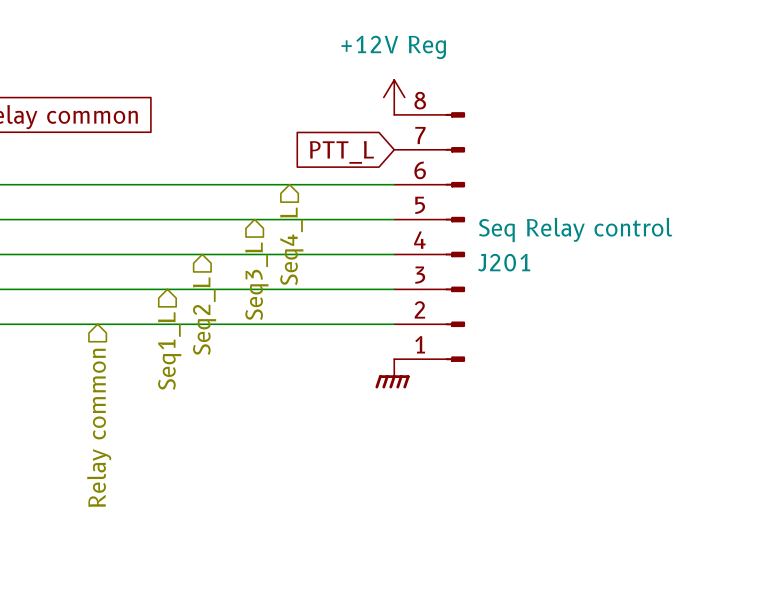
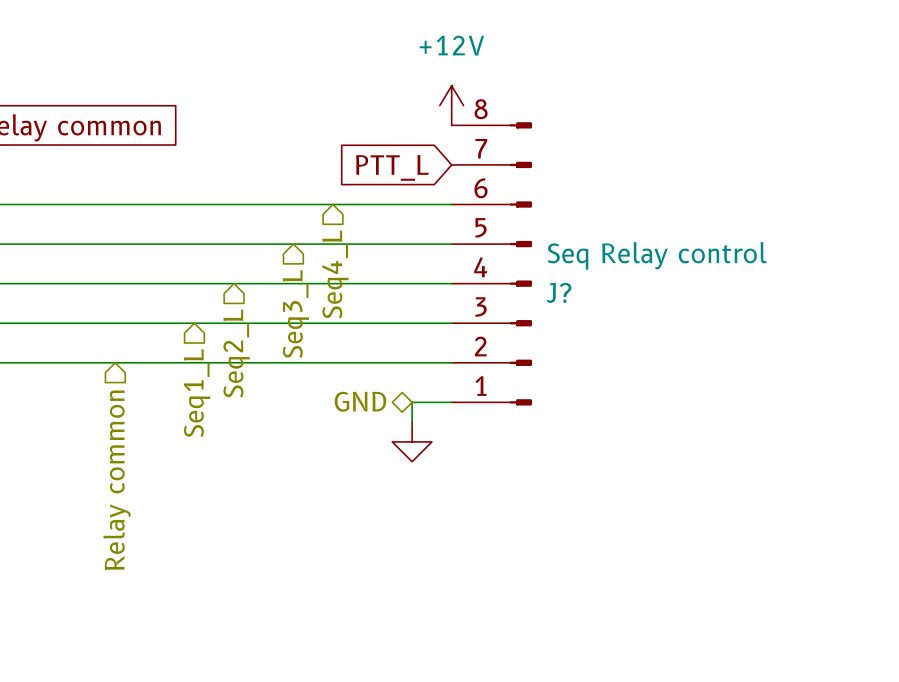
power symbol: +12V Reg (394, 97) -> +12V (451, 105)
J201 name: J201 (504, 262) -> J? (559, 292)
hierarchical label: none -> GND (360, 401)
wire: none -> (451, 402) (412, 402) (412, 422)
power symbol: (392, 373) -> none
power symbol: none -> (412, 441)

